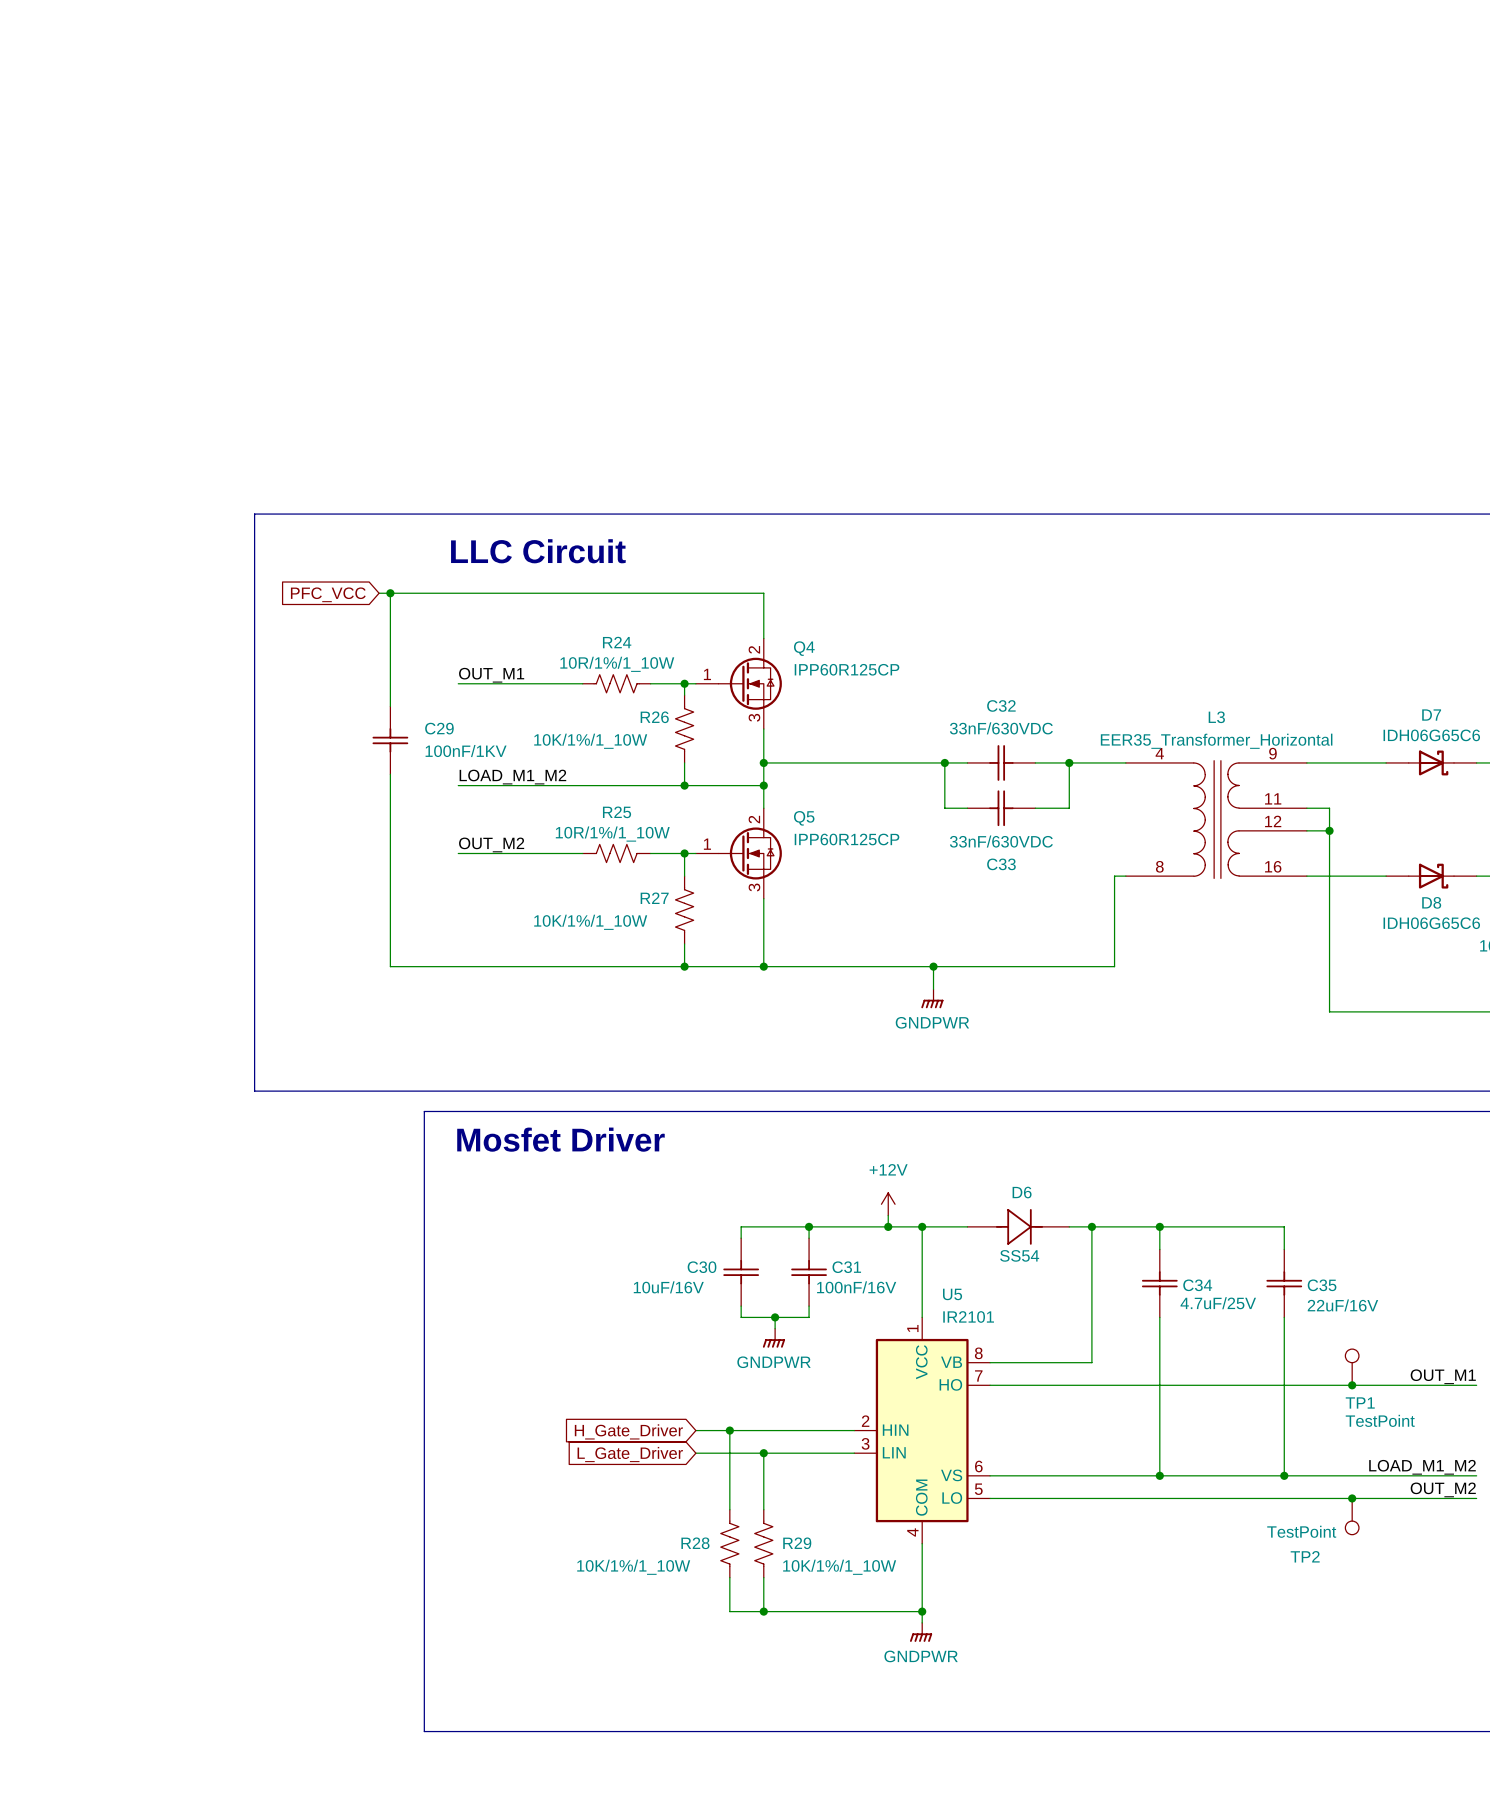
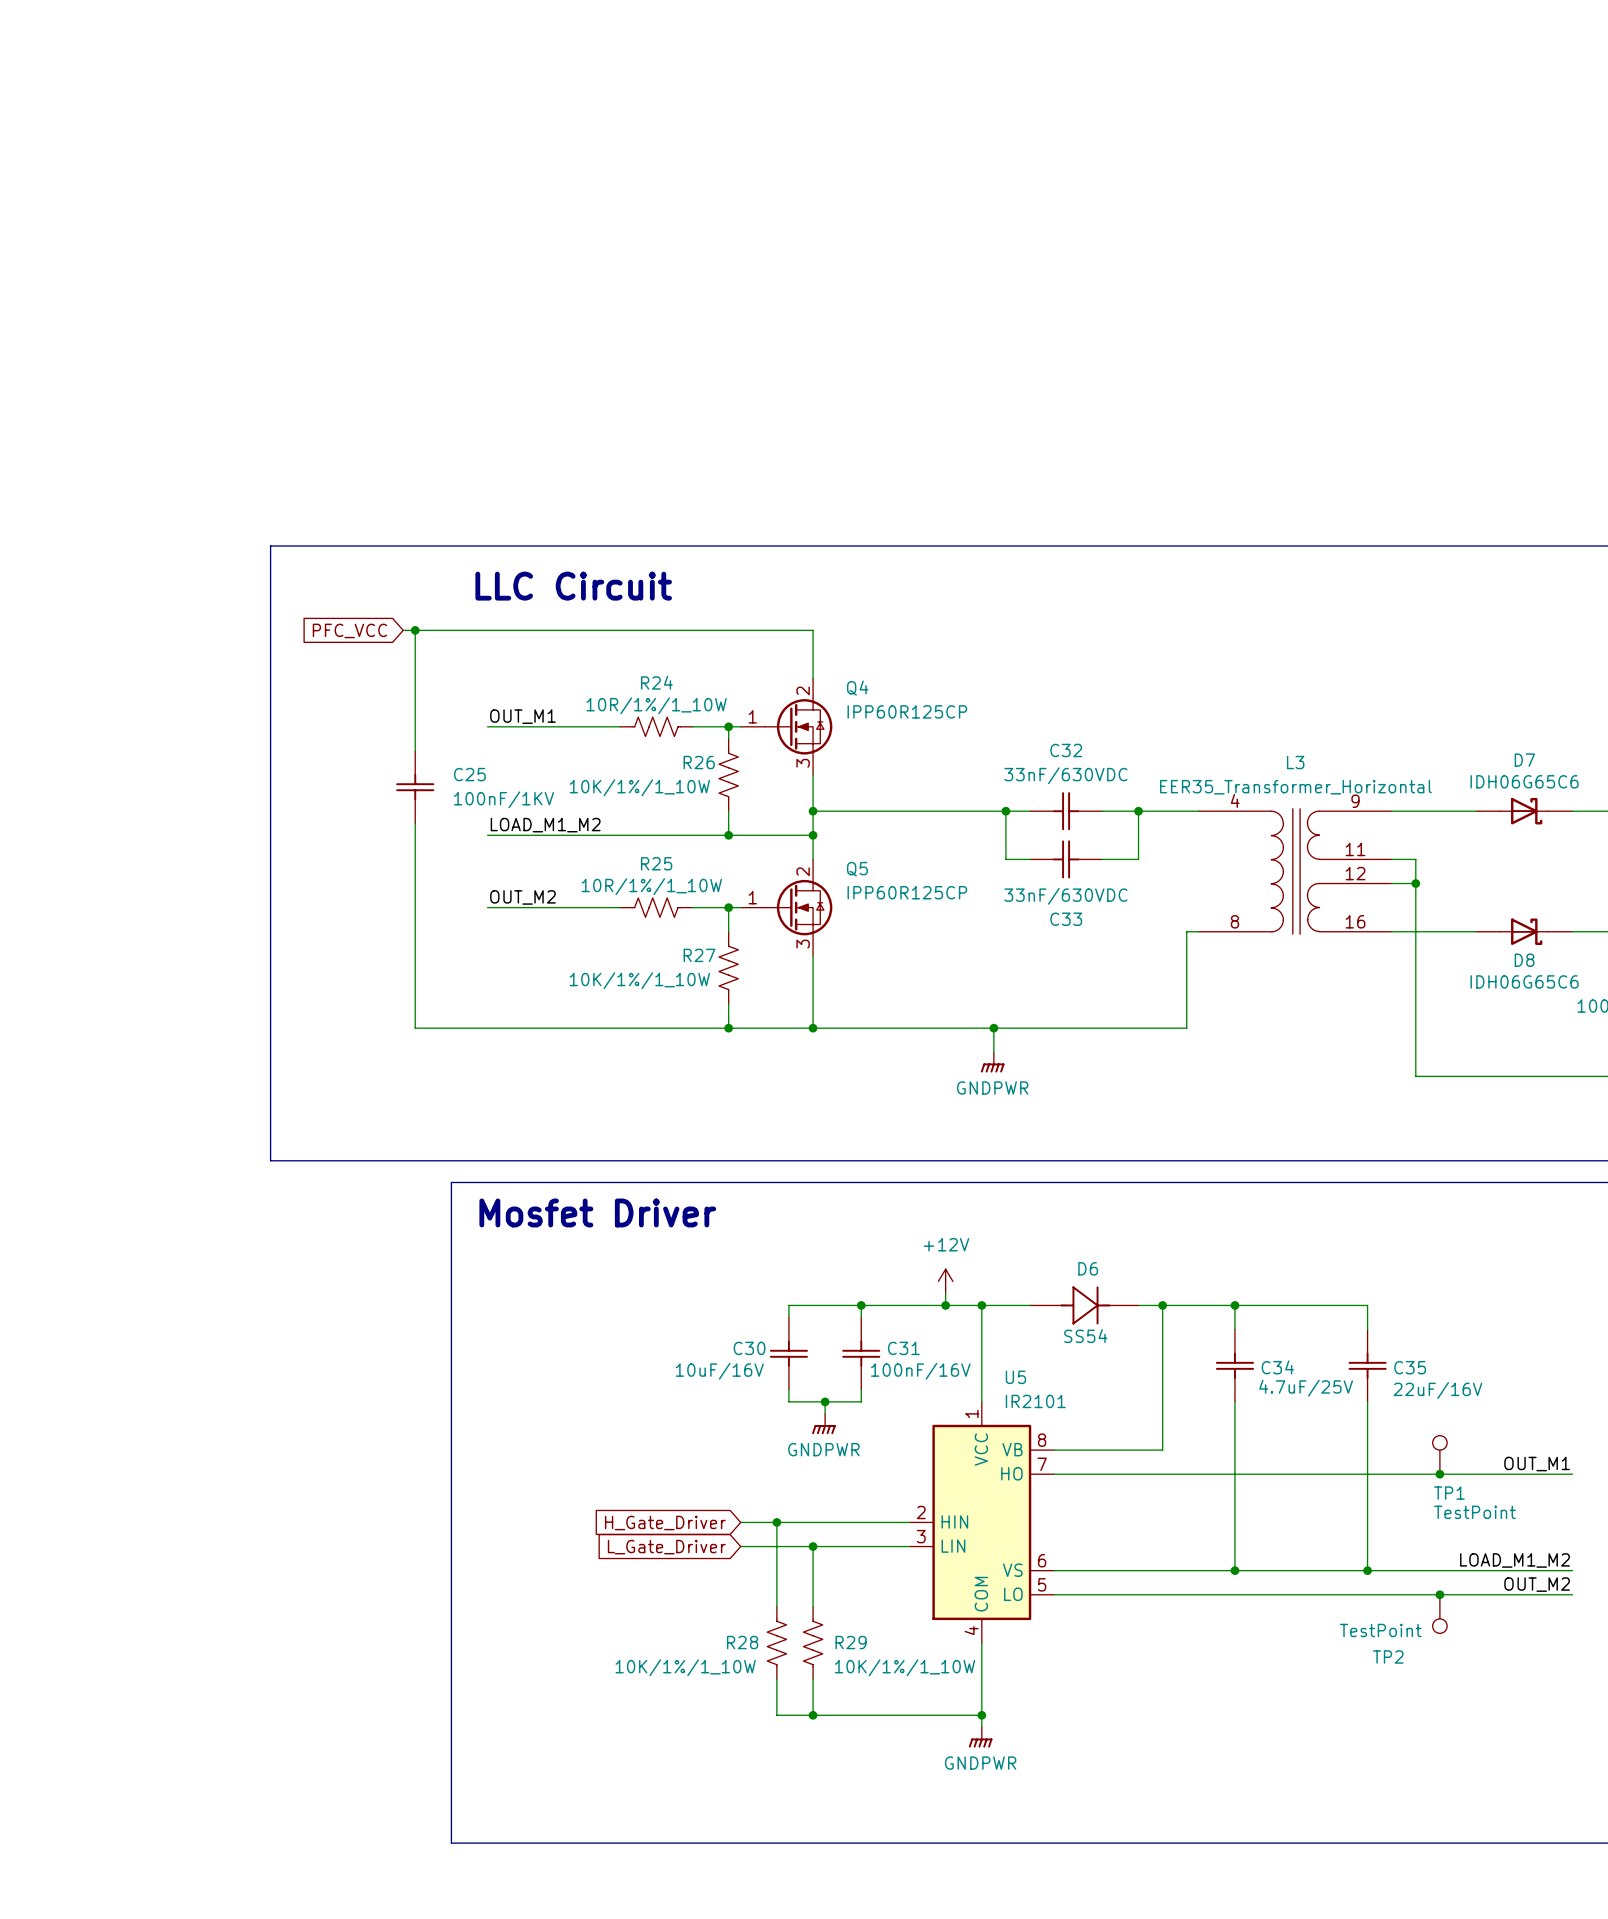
C29 name: C29 (439, 728) -> C25 (469, 774)

